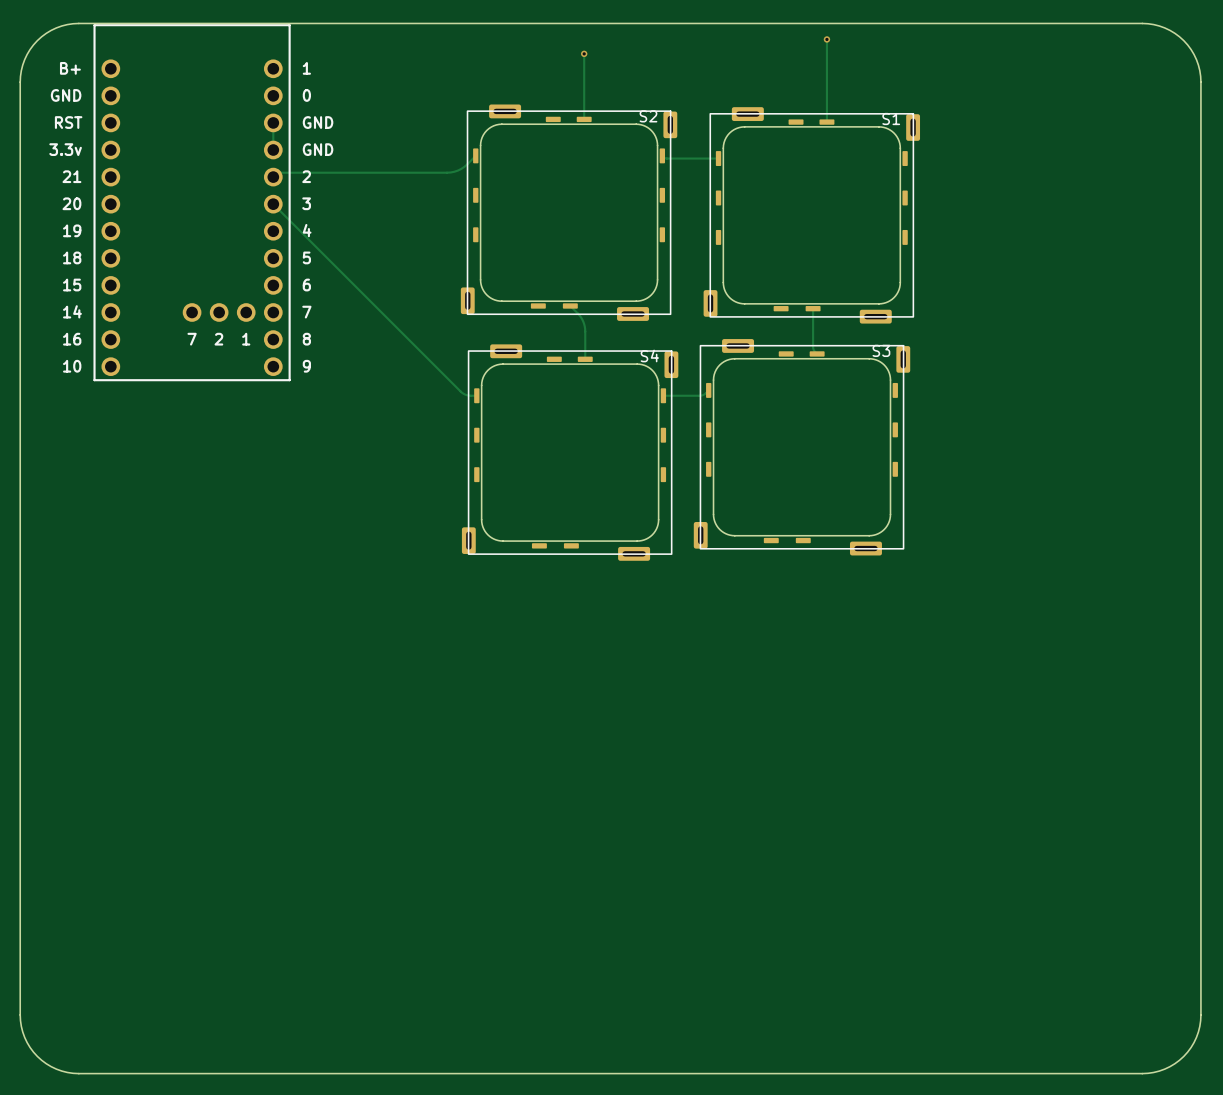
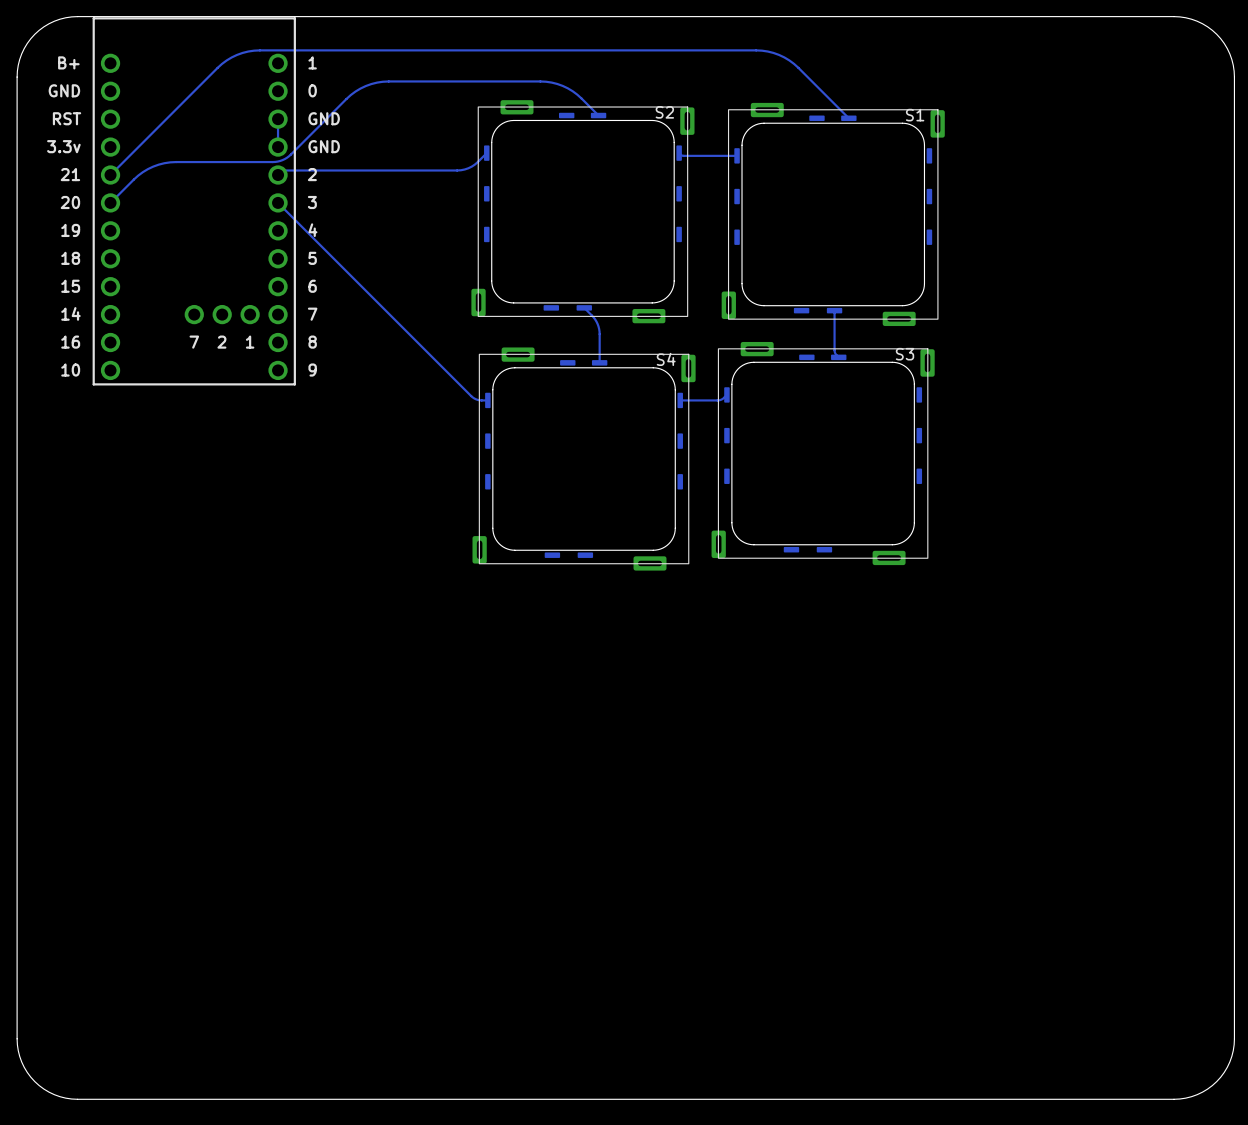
track: (826, 39) (826, 122) -> (110, 174) (221, 63) (237, 54) (254, 50) (762, 50) (779, 54) (794, 63) (848, 118)
via: (826, 39) -> none
track: (584, 53) (584, 119) -> (110, 202) (142, 172) (164, 163) (272, 162) (282, 160) (290, 154) (350, 95) (365, 86) (377, 82) (551, 82) (572, 91) (598, 115)
via: (584, 53) -> none

